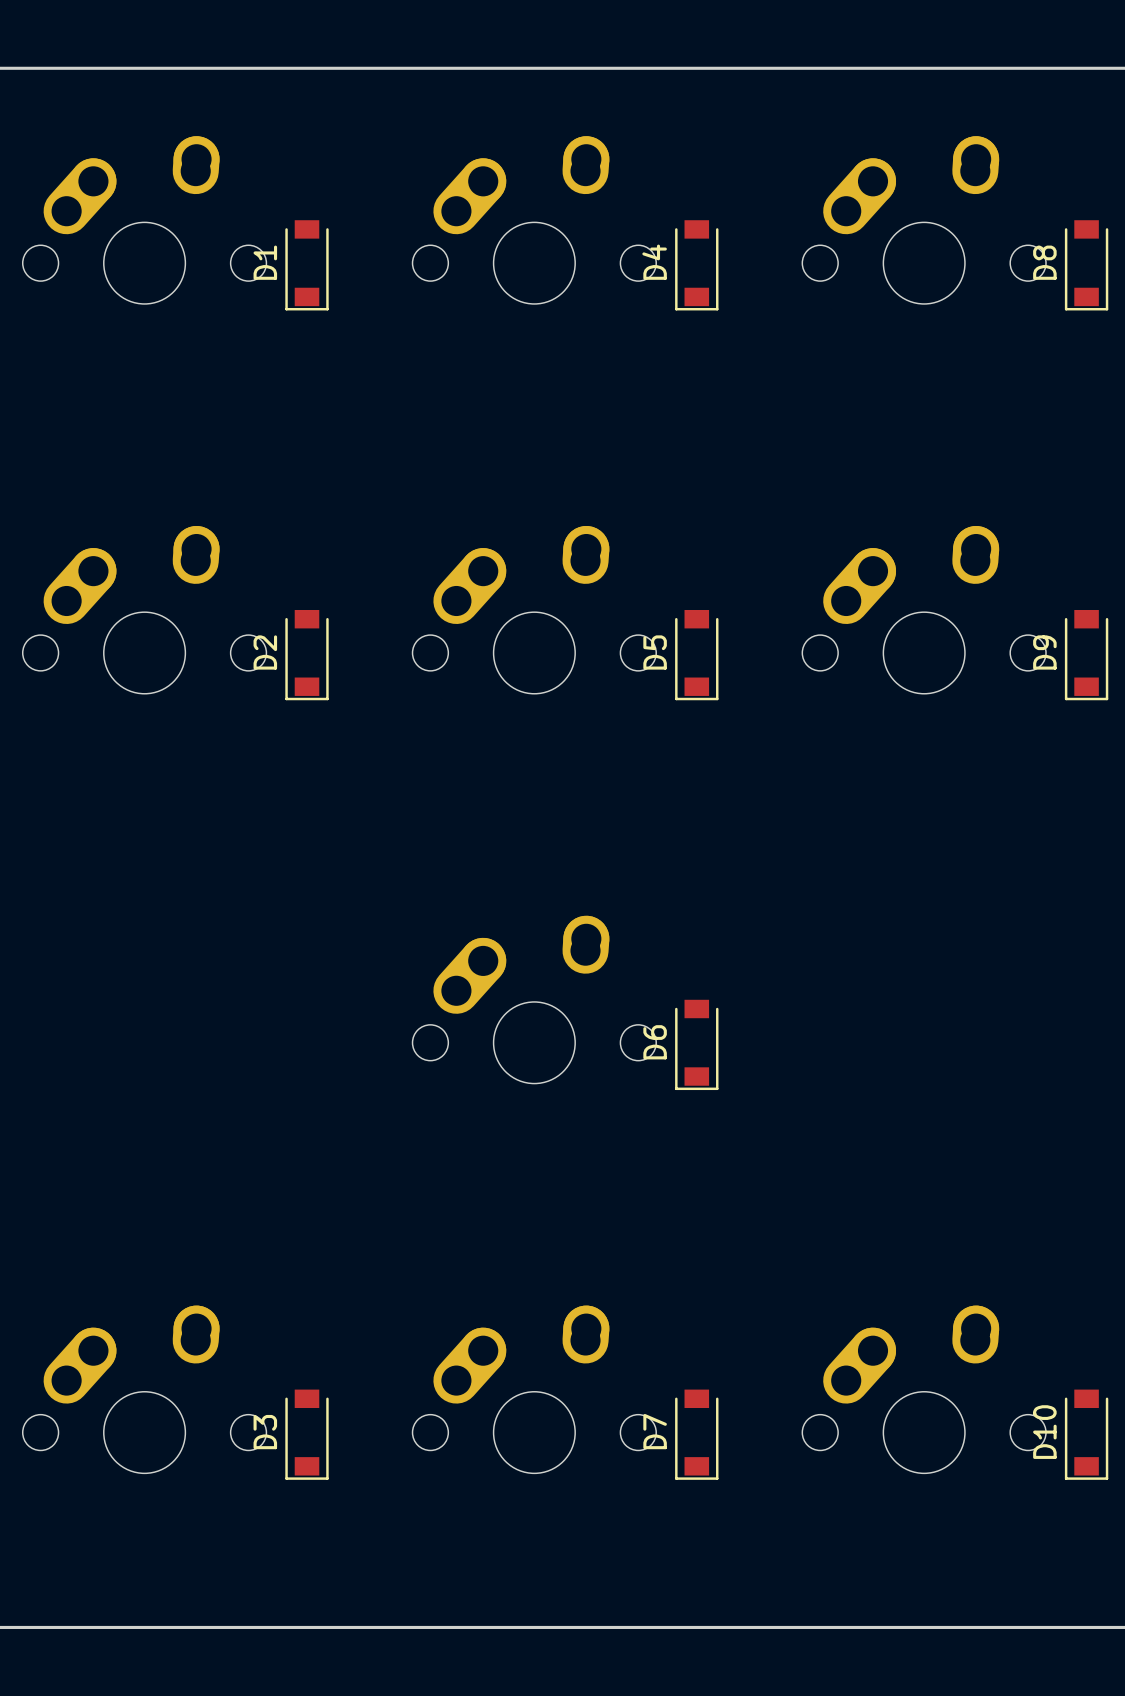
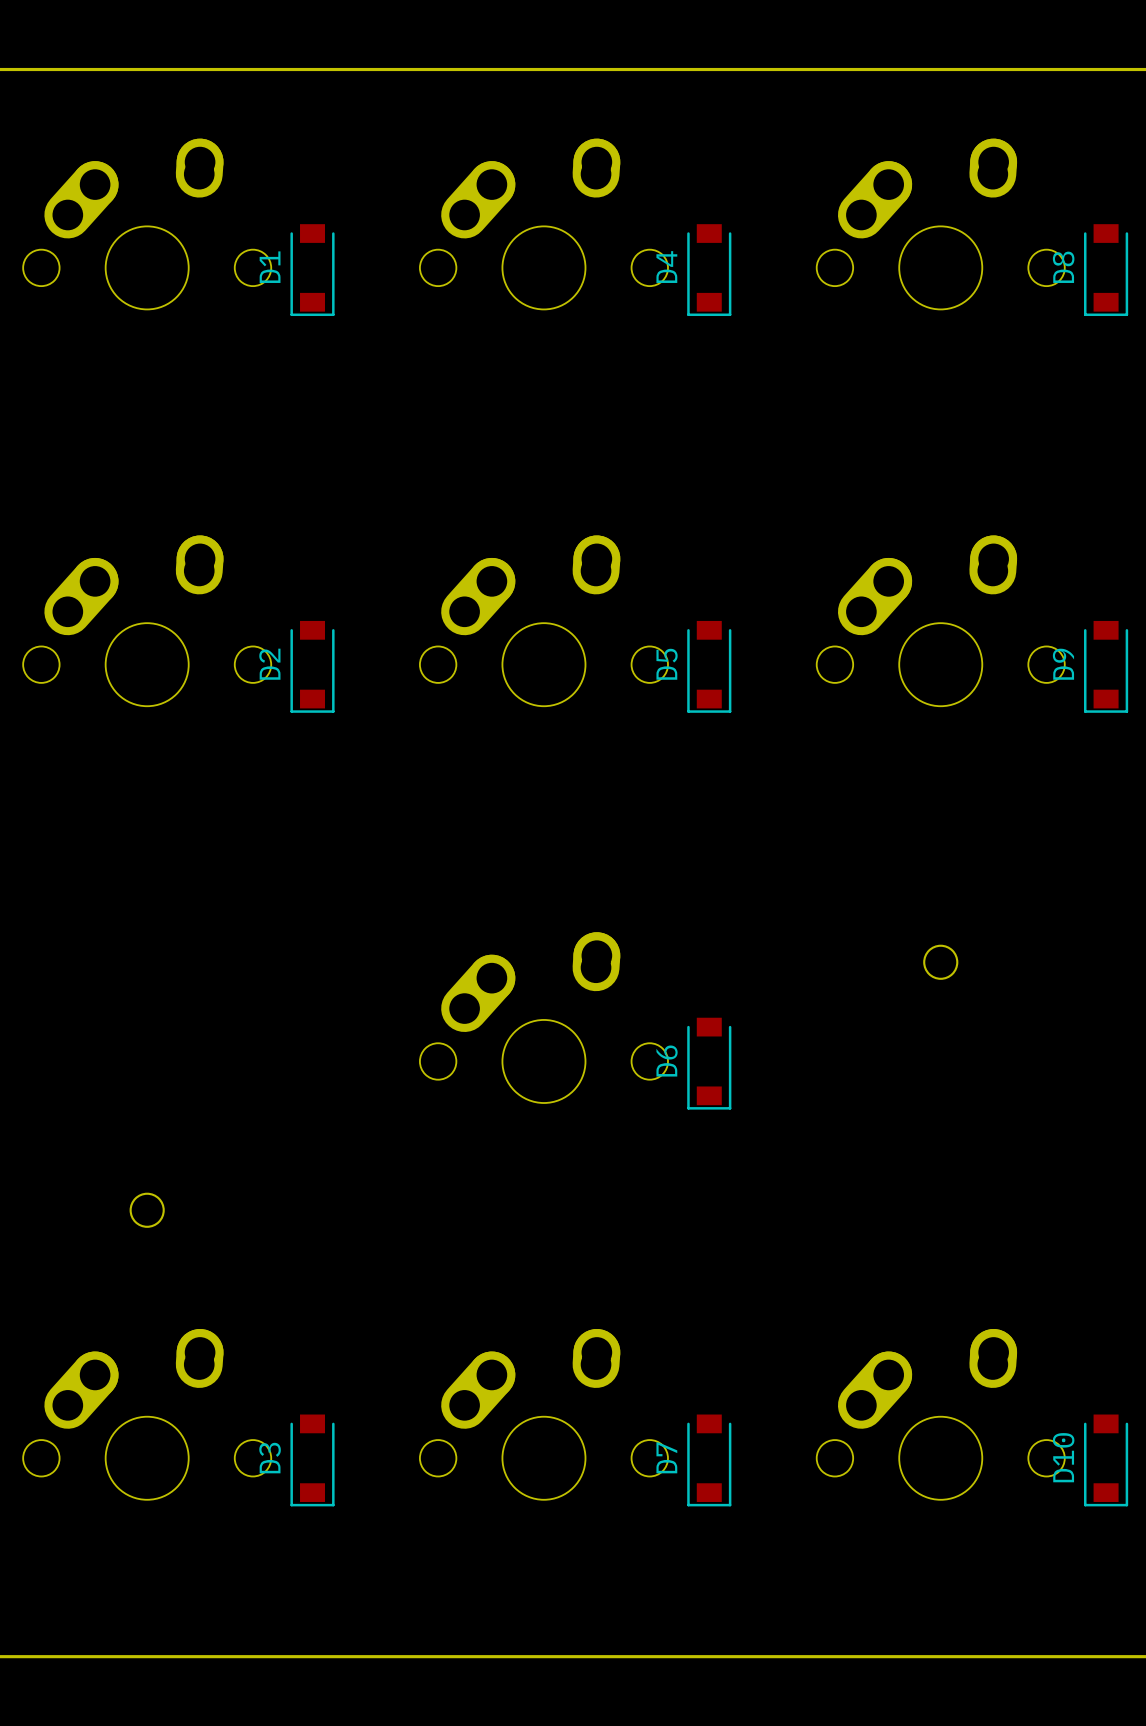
round board edge: none -> [923, 944, 959, 980]
round board edge: none -> [129, 1192, 165, 1228]

